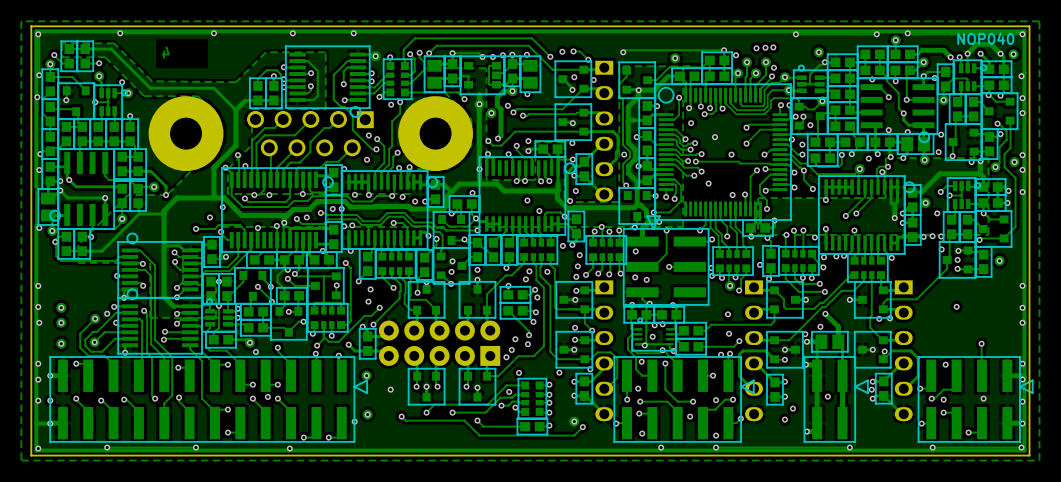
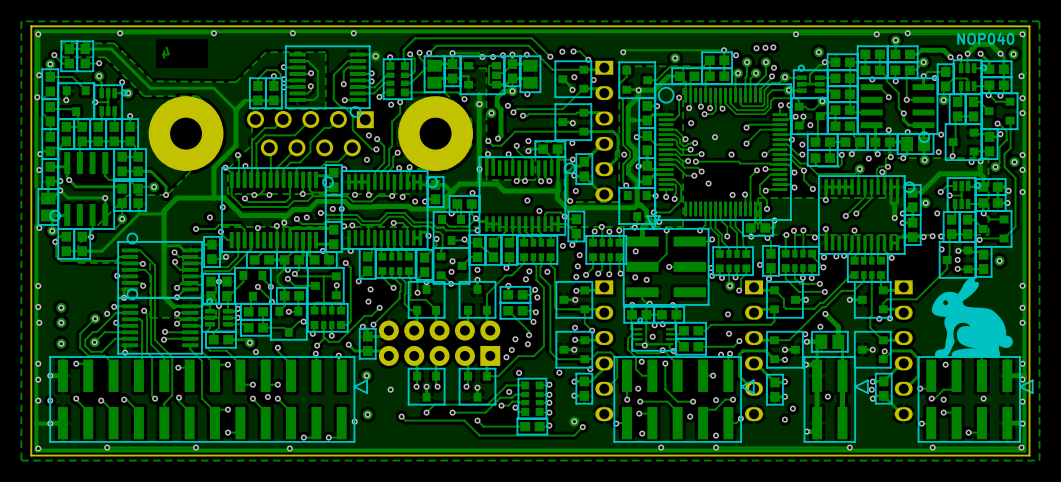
drawing: none -> [931, 277, 1013, 358]
track: (586, 395) (604, 414) -> none

